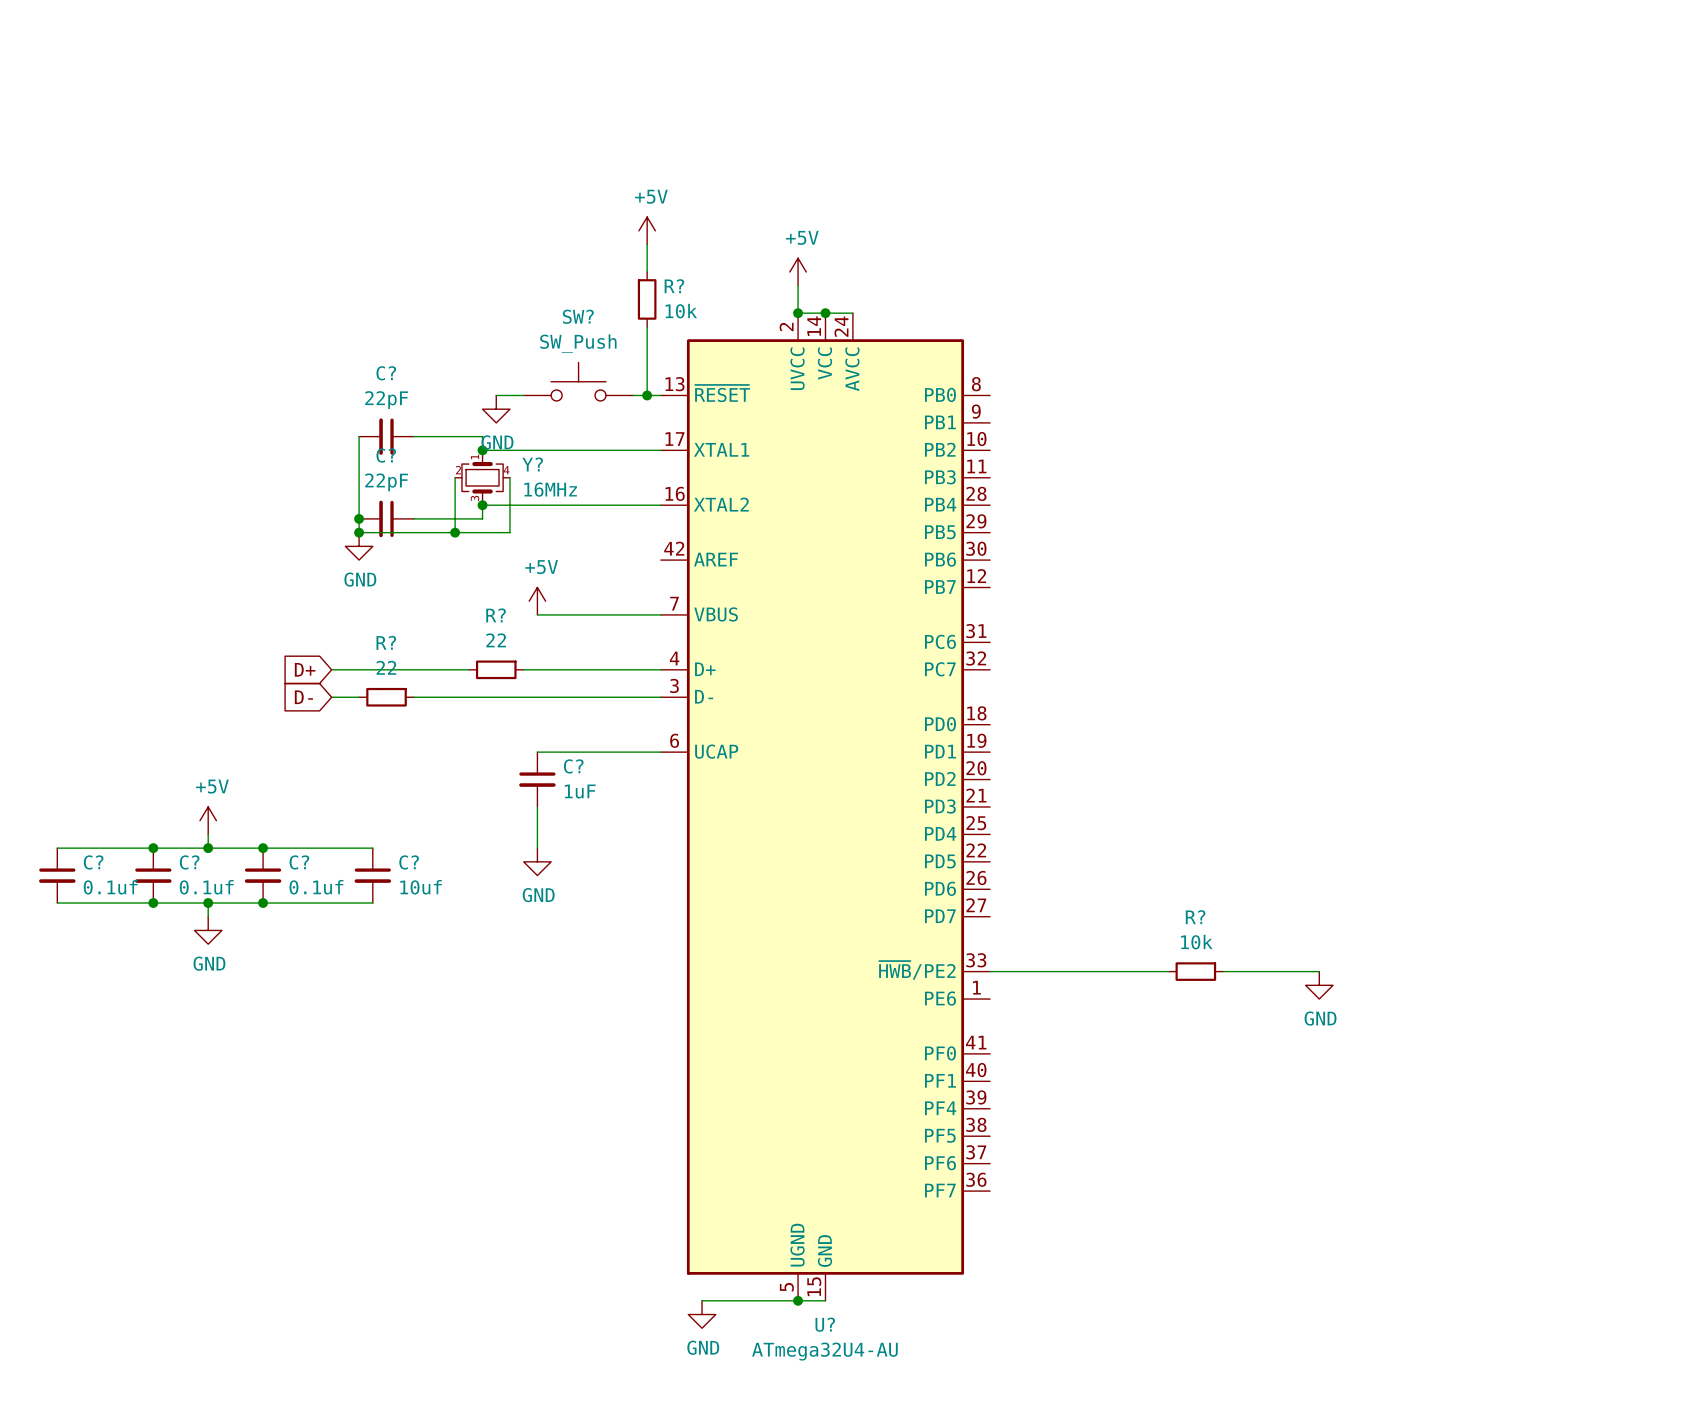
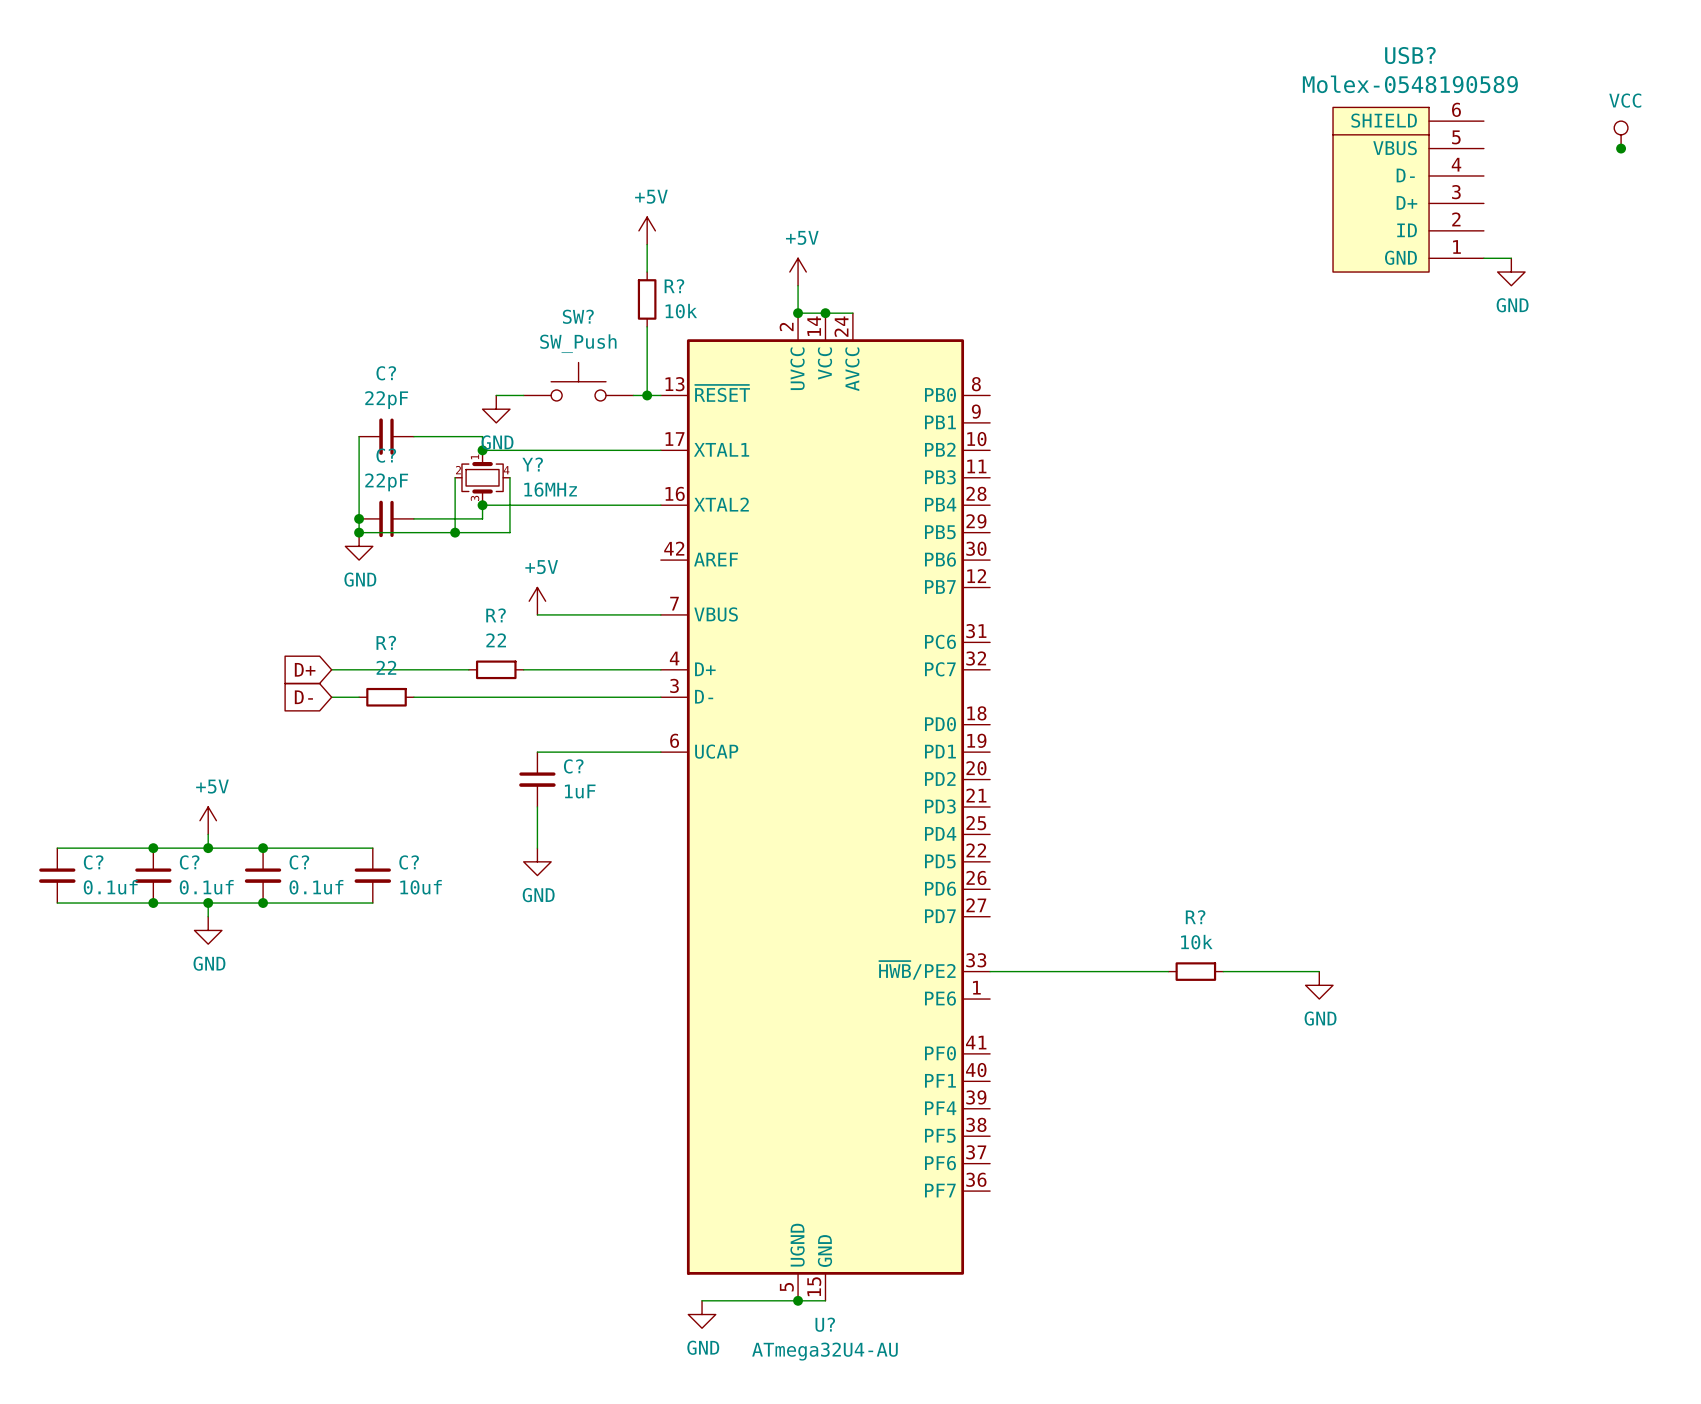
power symbol: none -> VCC (1621, 134)
junction: none -> (1621, 148)
USB?: none -> Molex-0548190589 (1408, 189)
wire: none -> (1483, 258) (1511, 258)
power symbol: none -> GND (1511, 272)

